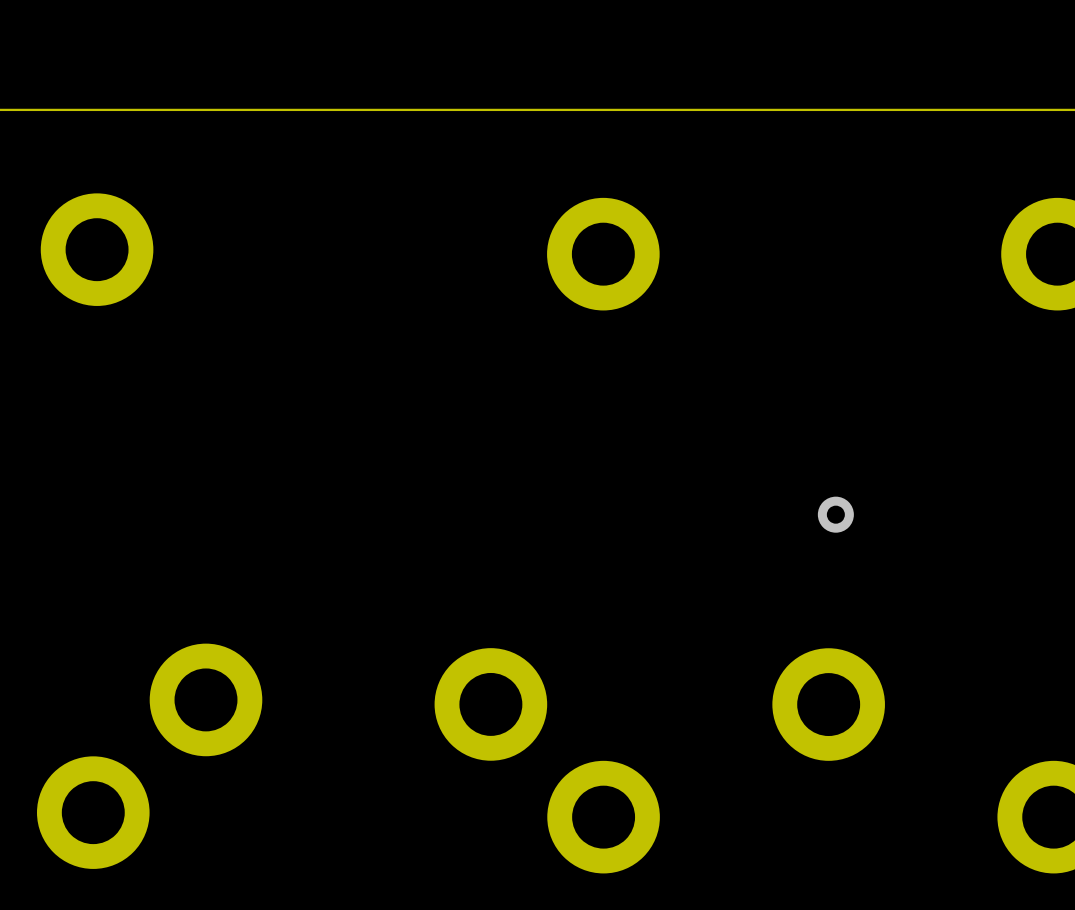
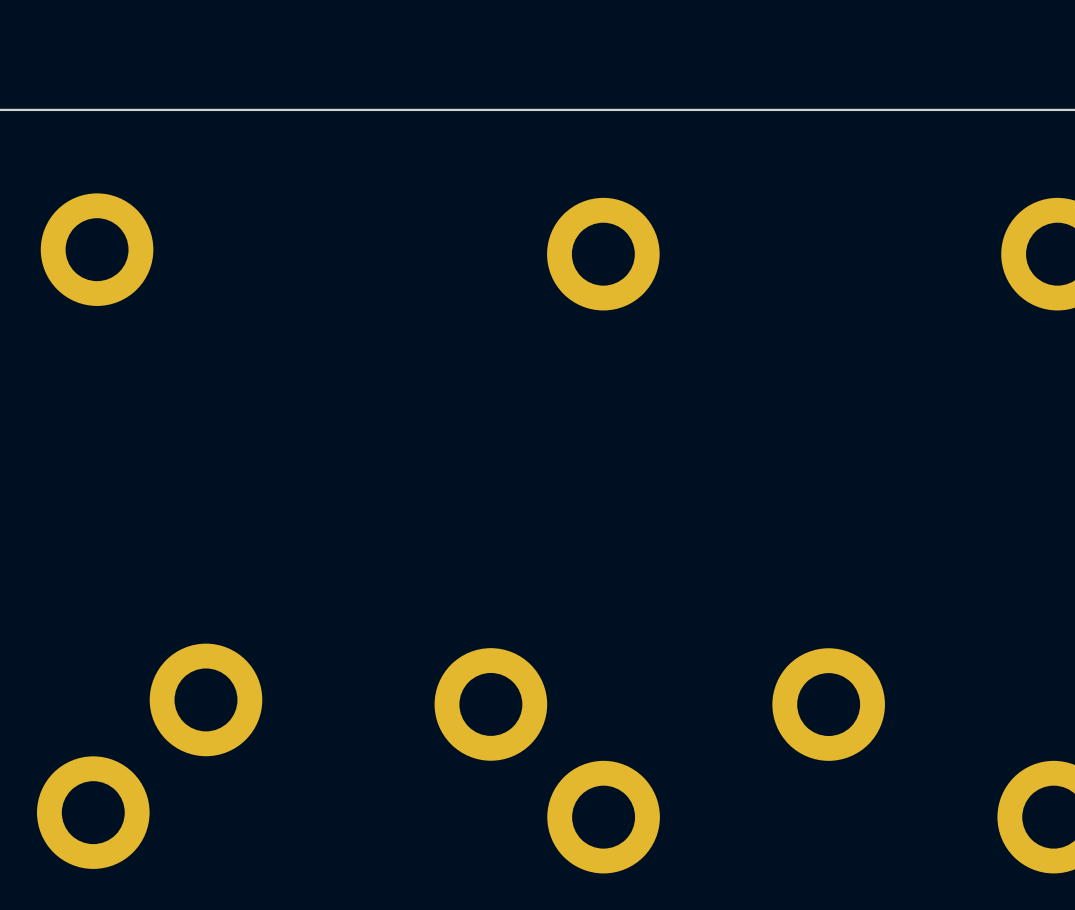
via: (835, 514) -> none

